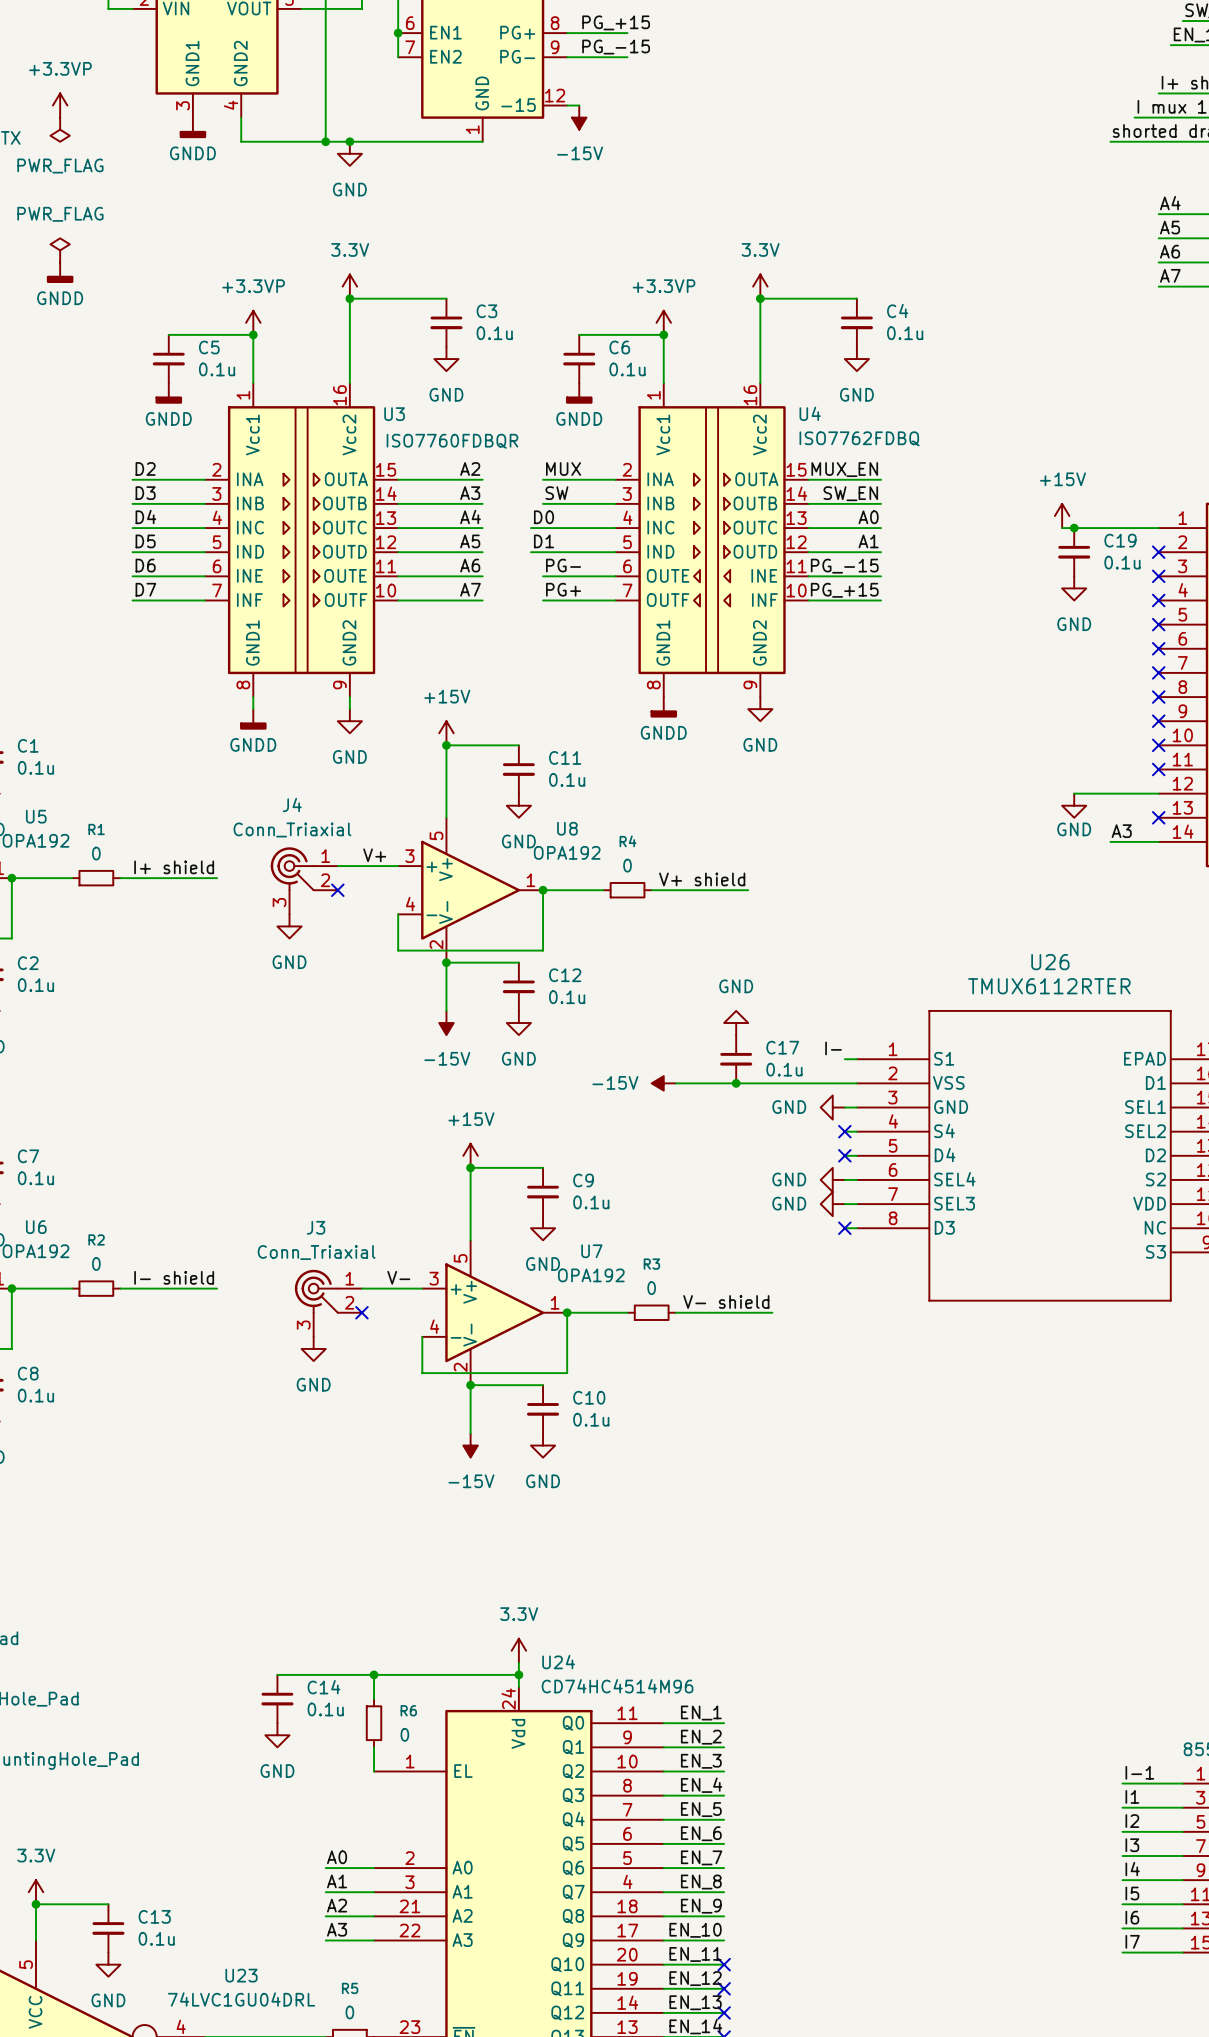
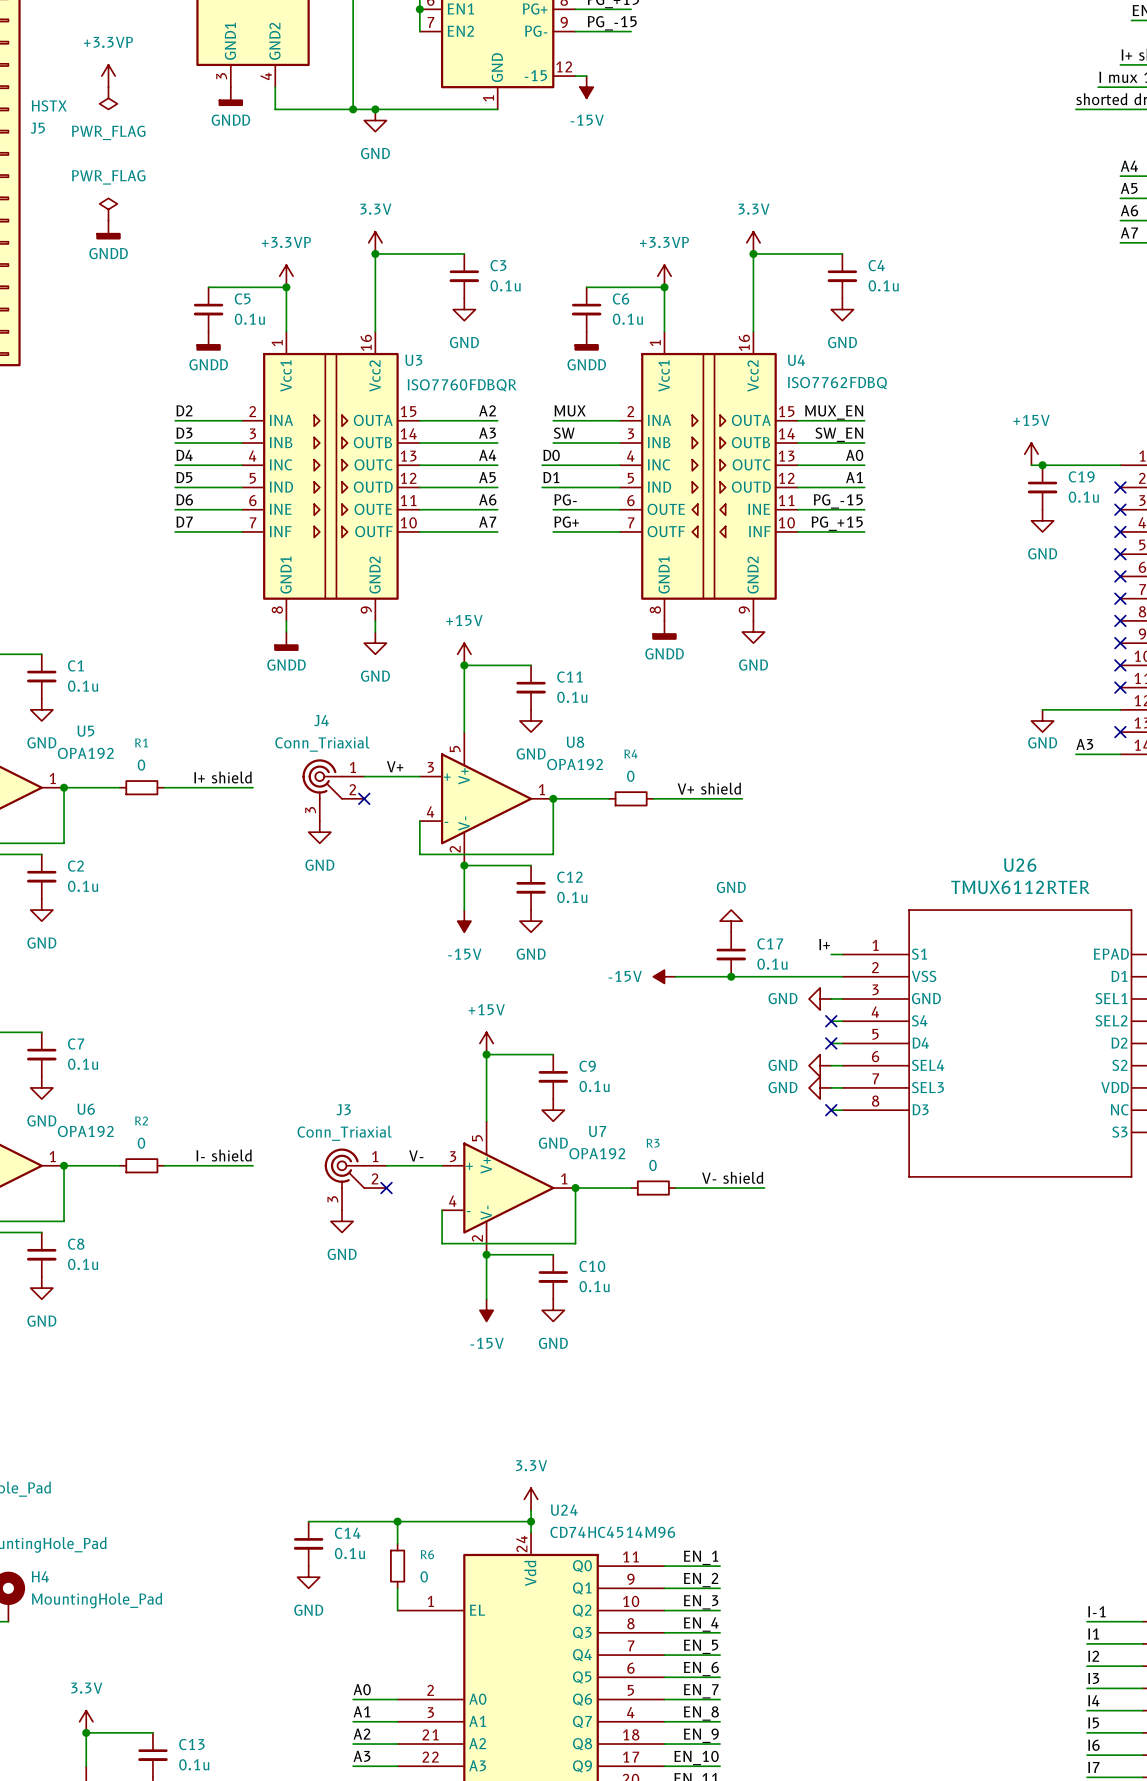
label: I- (833, 1048) -> I+ (824, 944)

